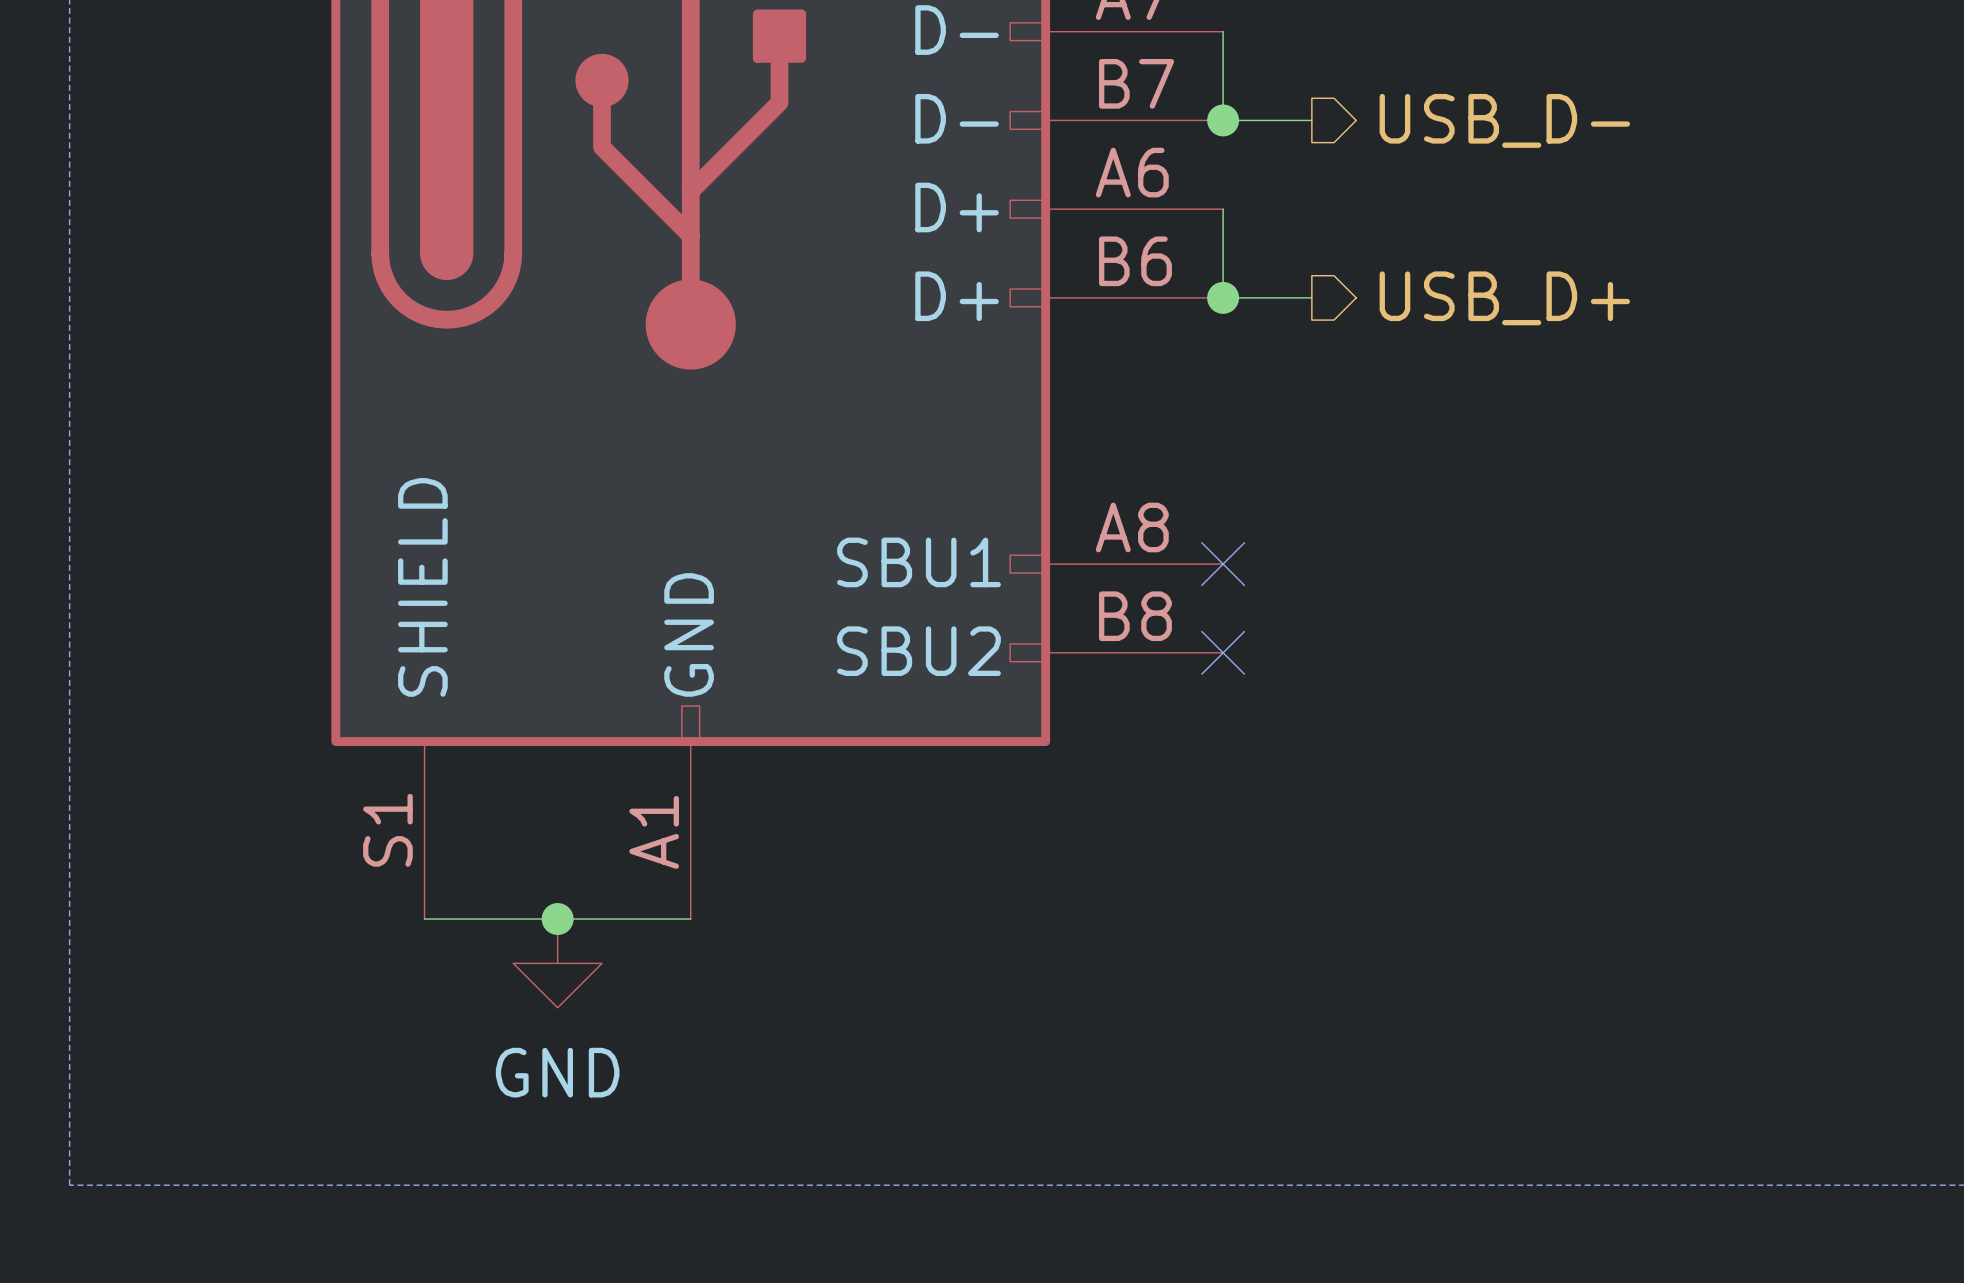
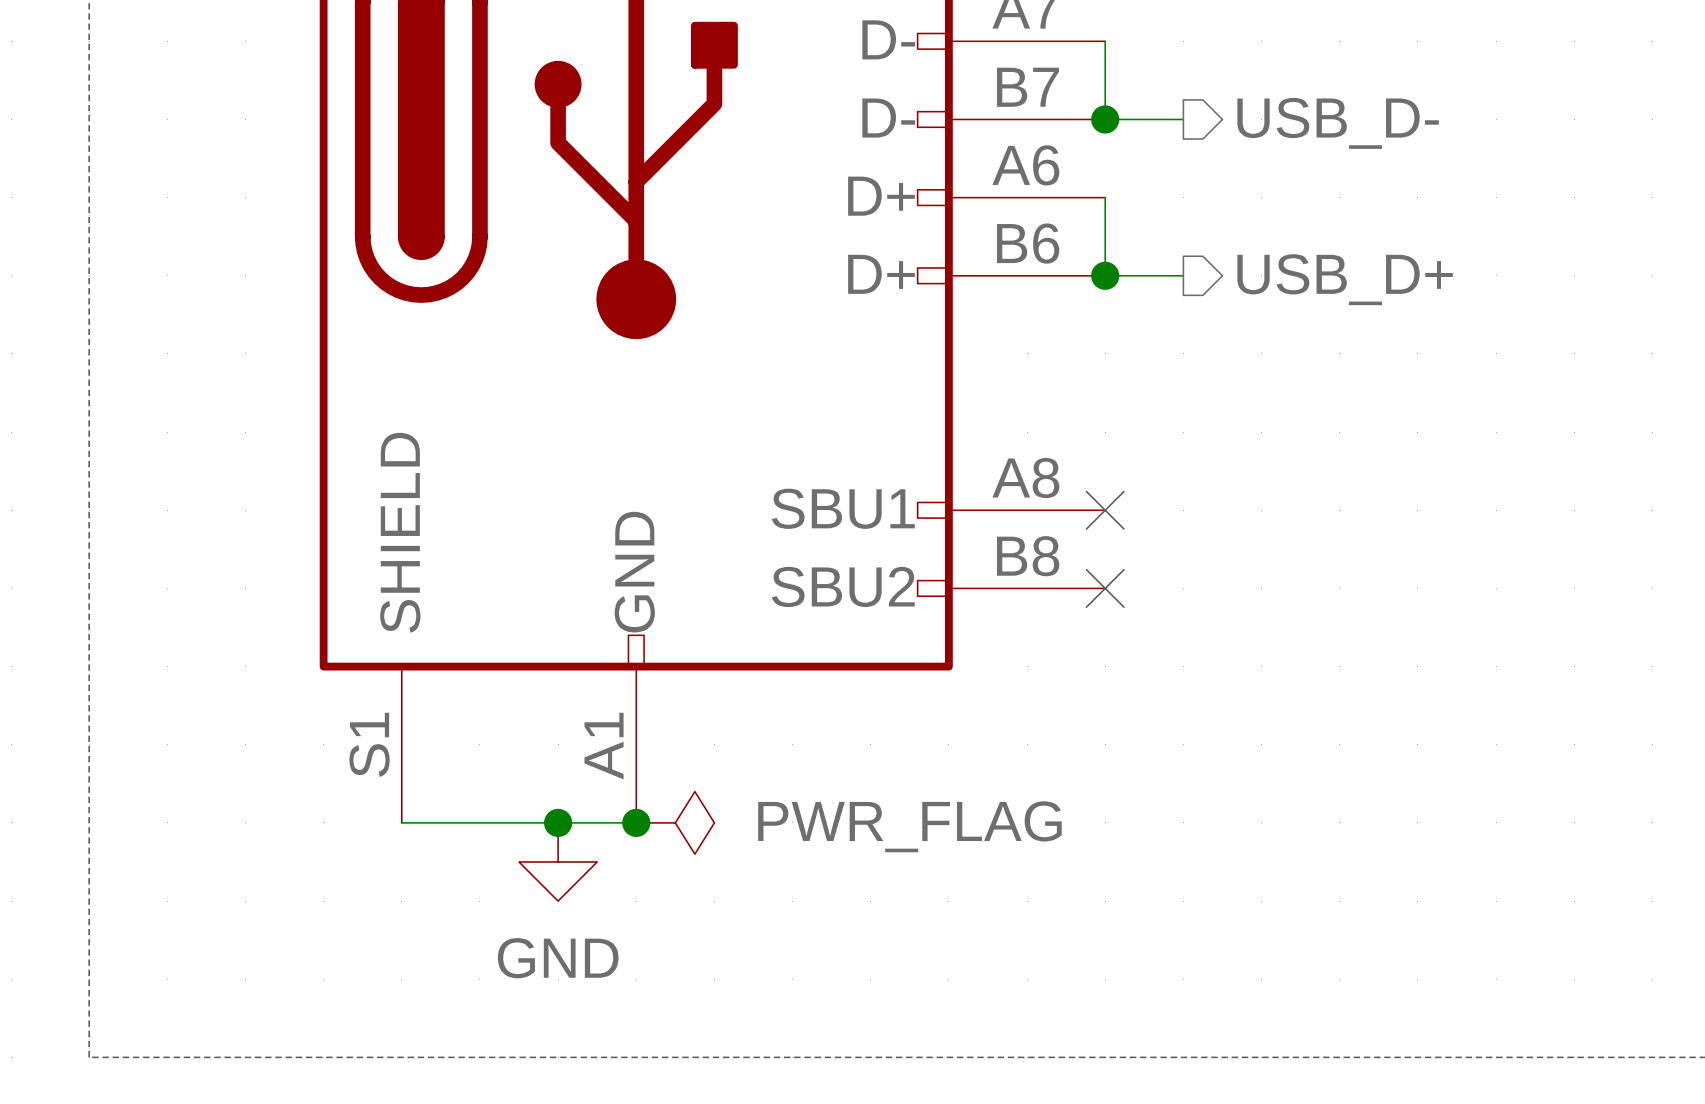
junction position: (557, 919) -> (558, 822)
junction: none -> (636, 822)
power symbol: none -> PWR_FLAG (675, 822)
power symbol position: GND (557, 963) -> GND (558, 861)

